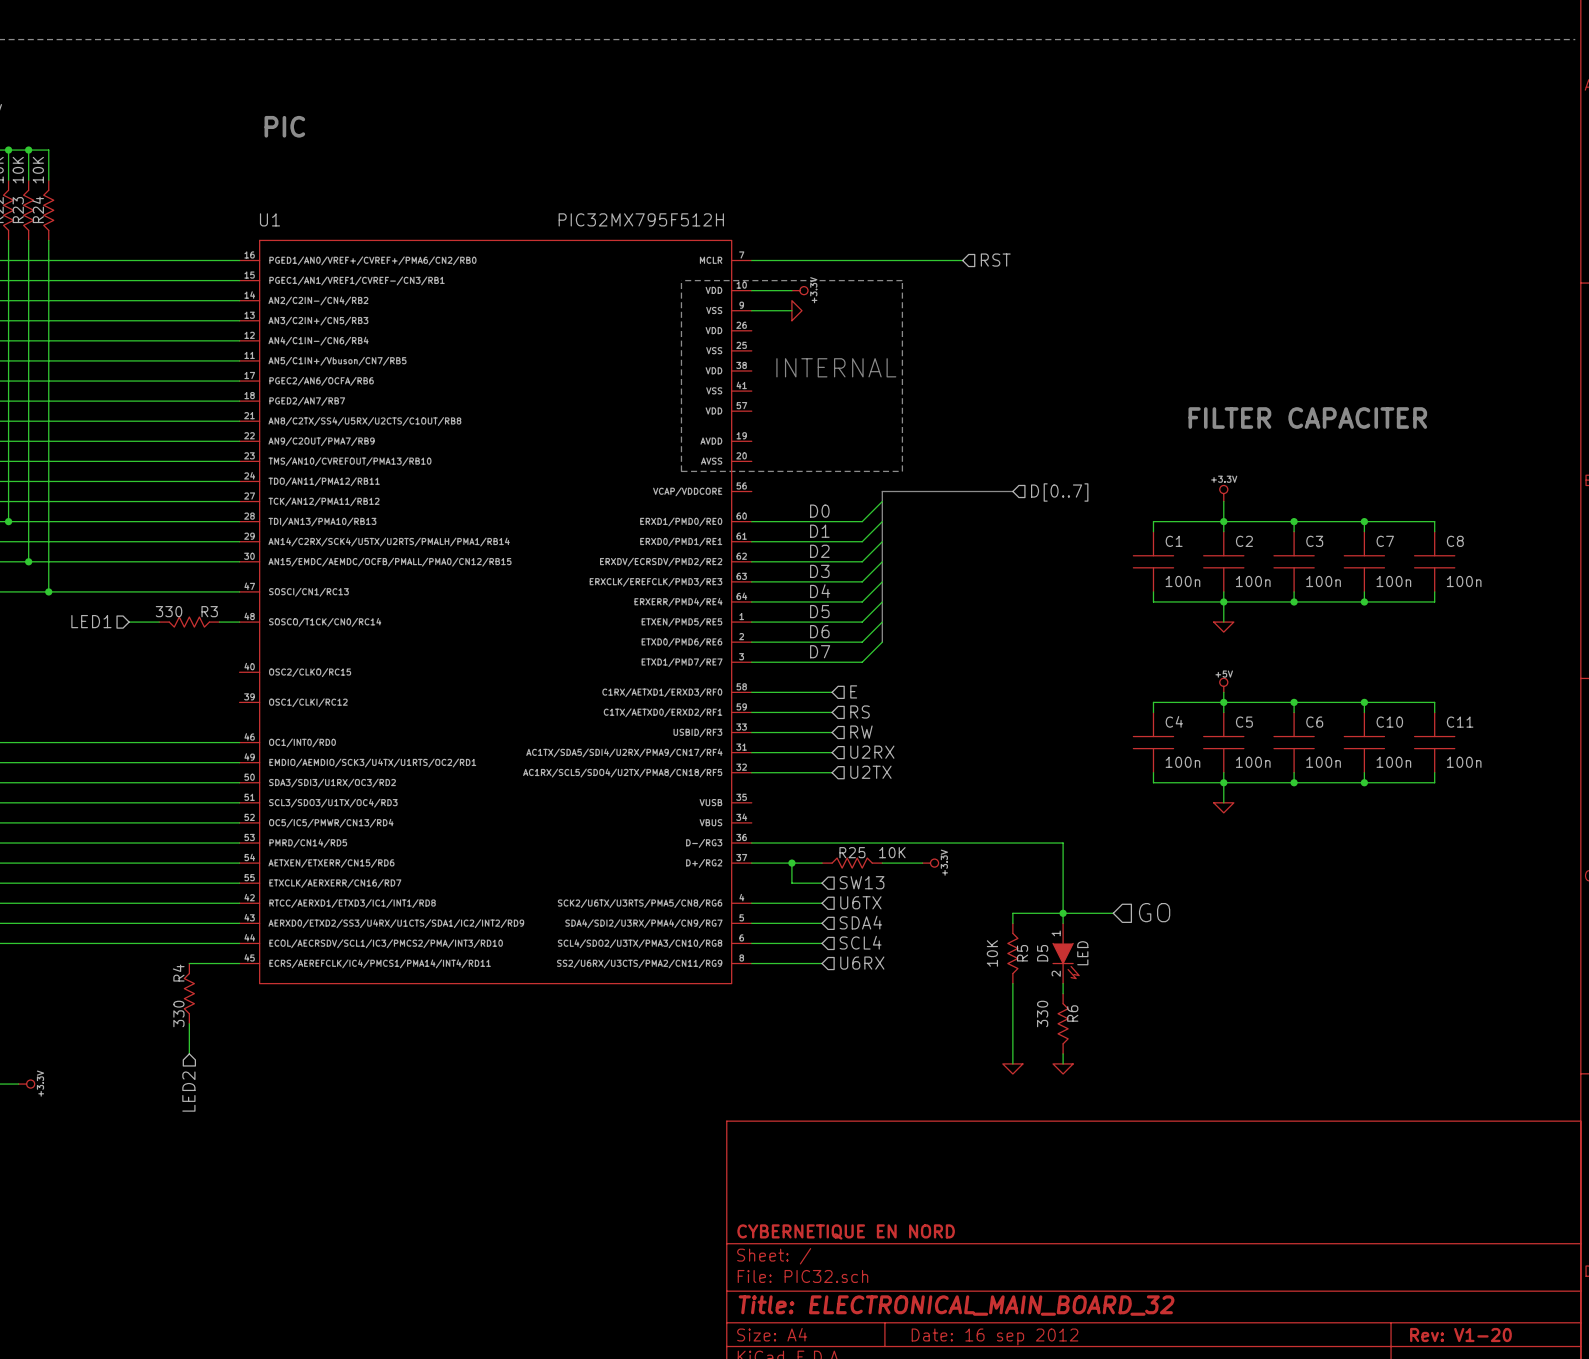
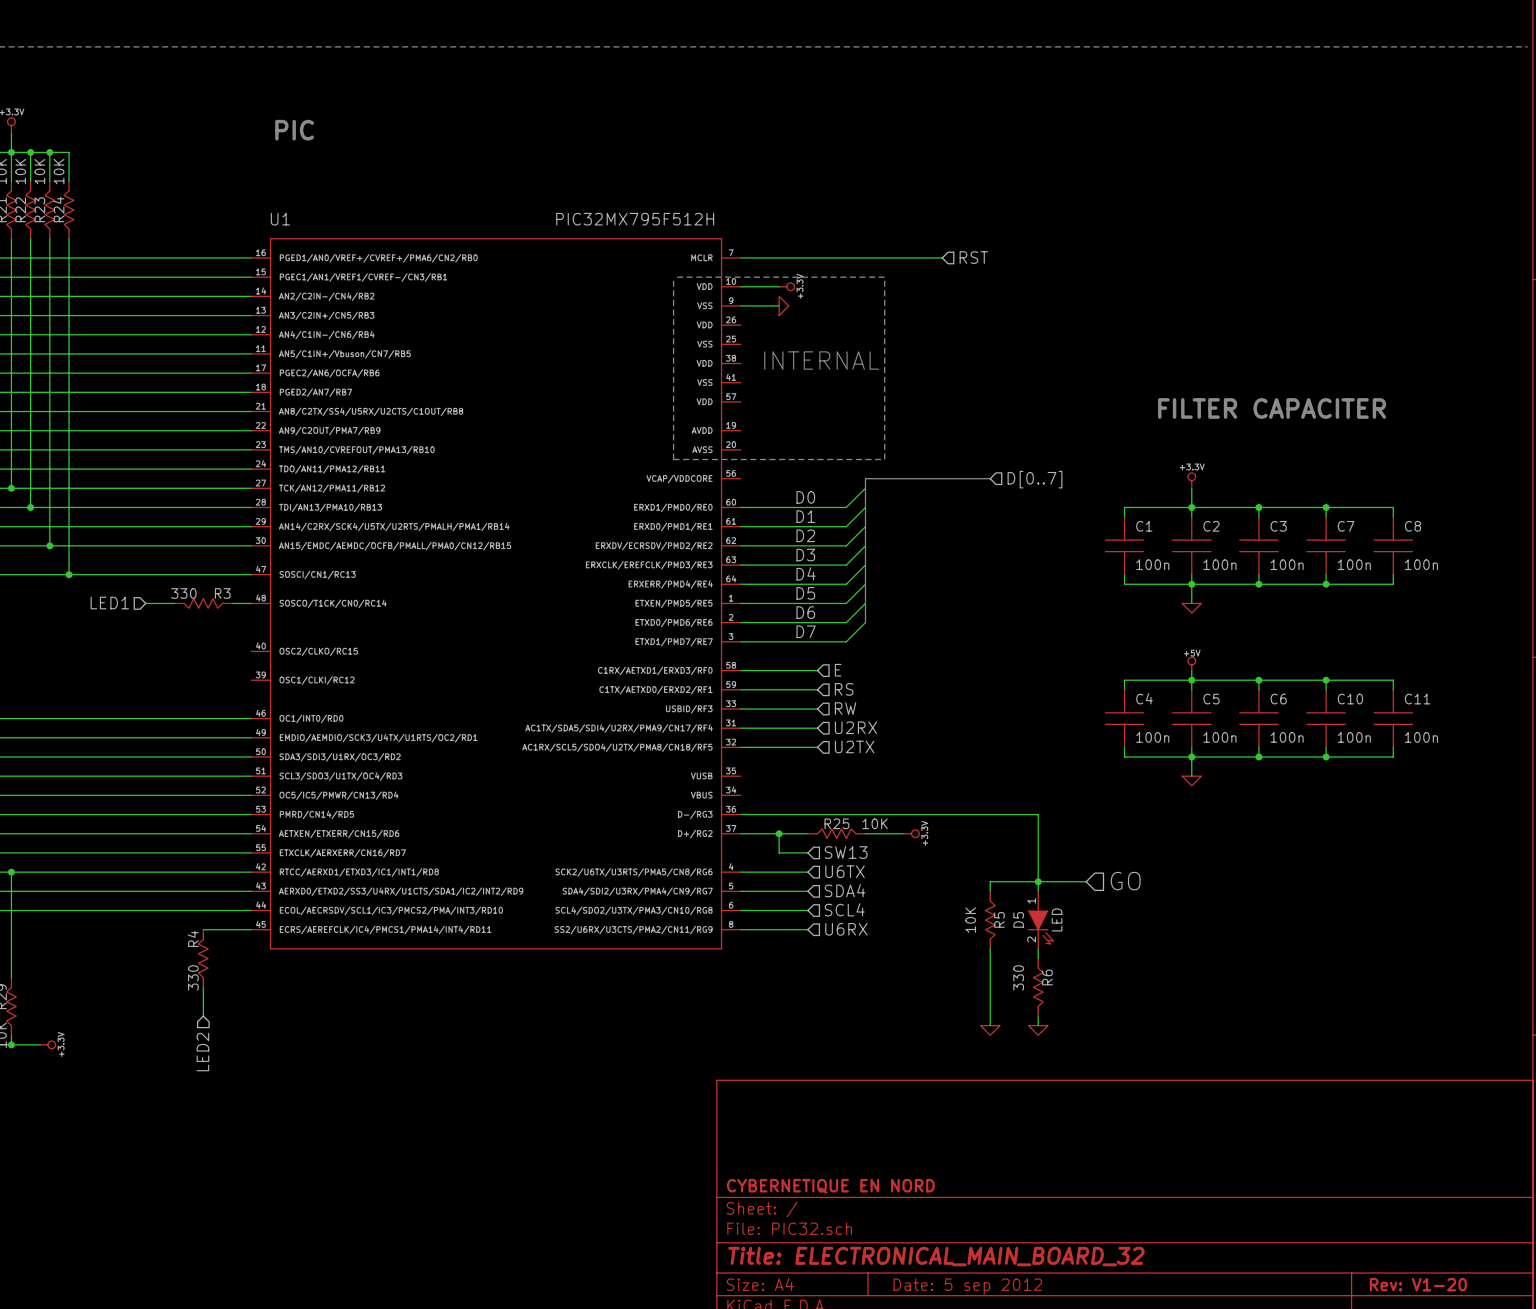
title block: Date: 16 sep 2012 (995, 1336) -> Date: 5 sep 2012 (967, 1286)

